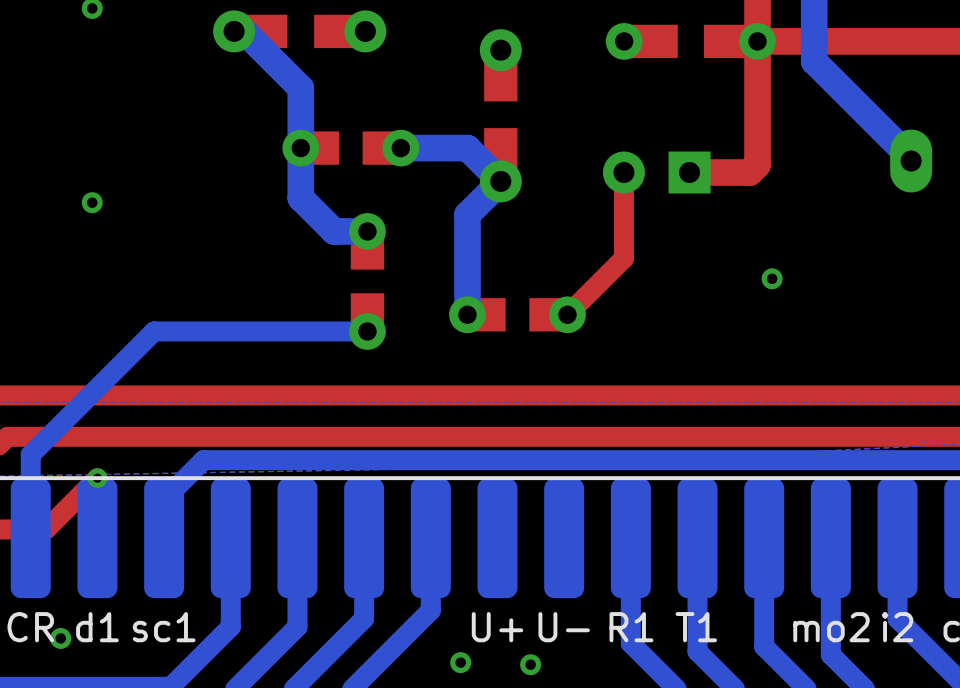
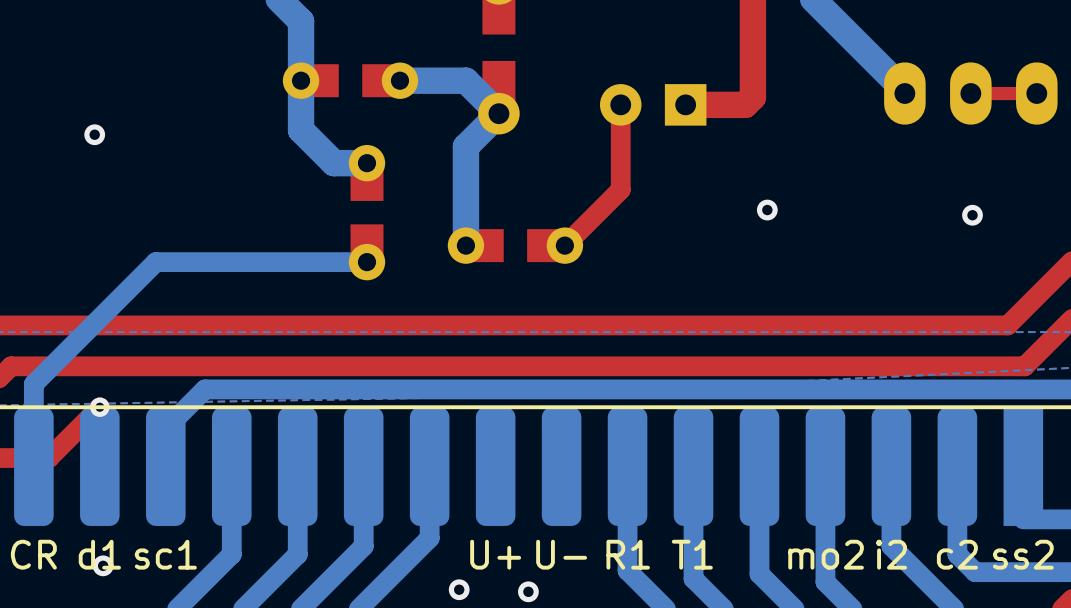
via position: (60, 638) -> (103, 565)

